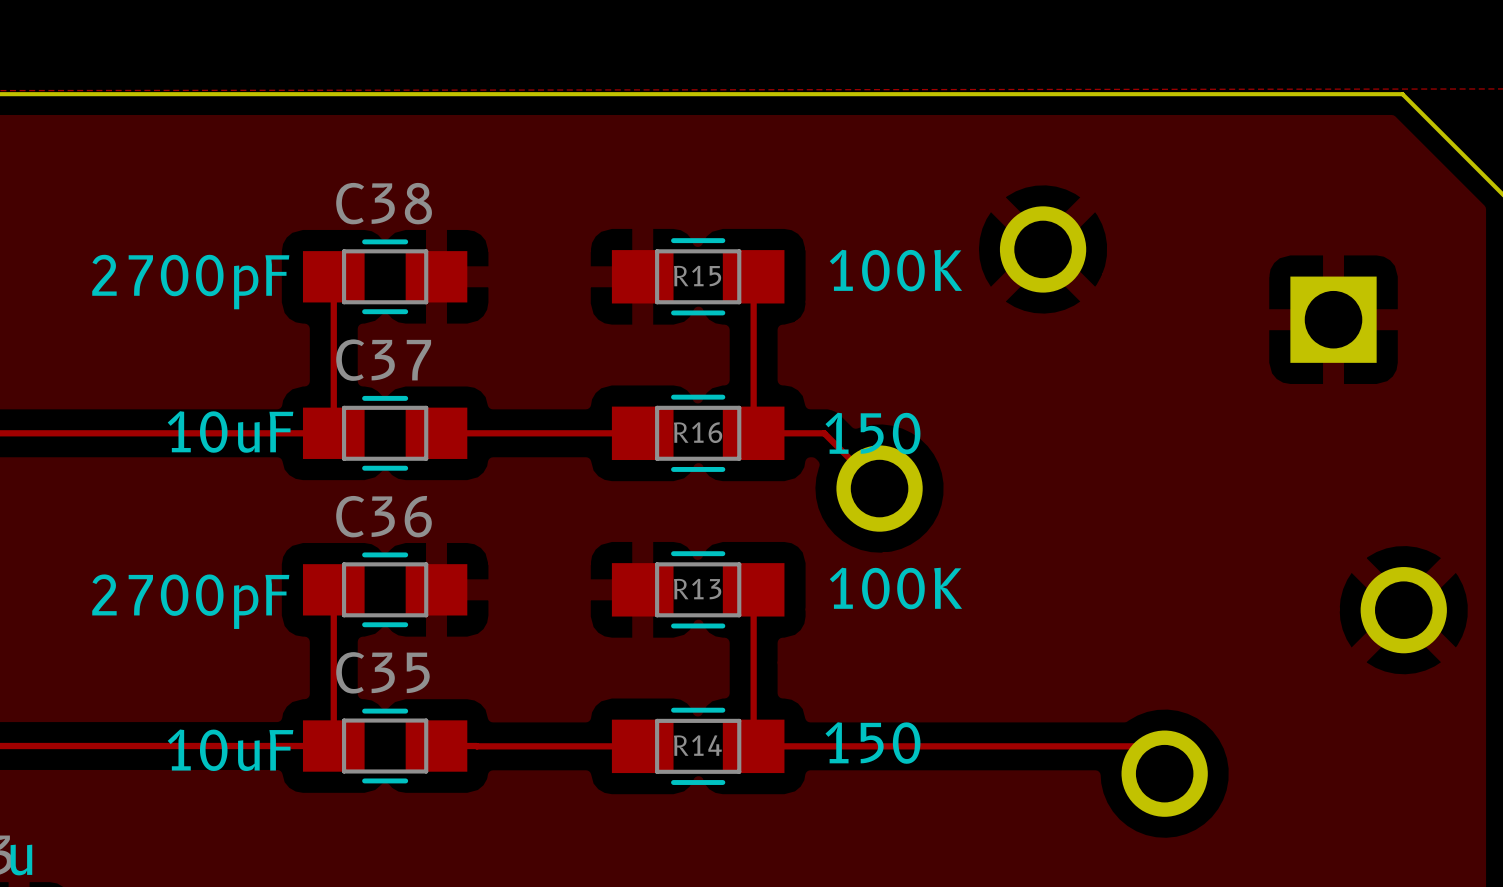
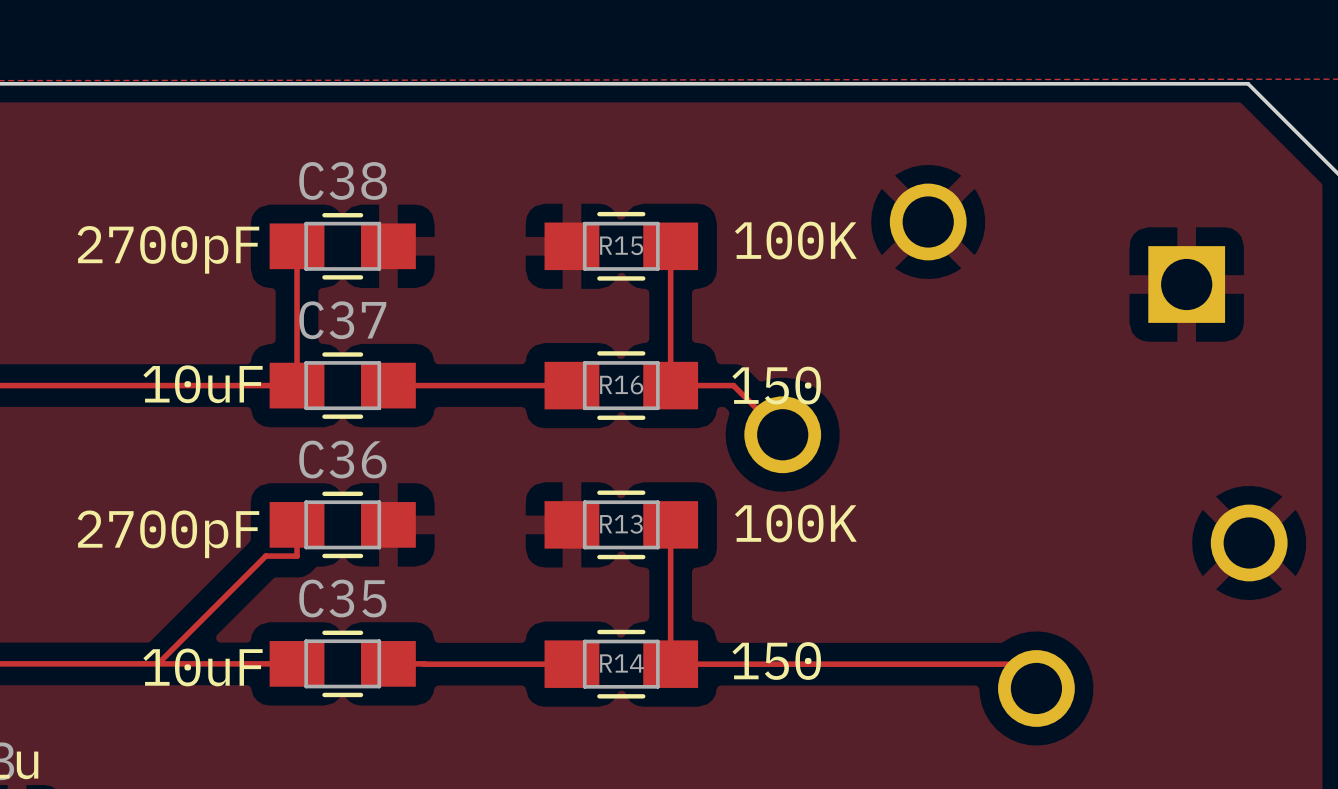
track: (333, 624) (333, 746) -> (297, 556) (265, 556) (158, 663)

